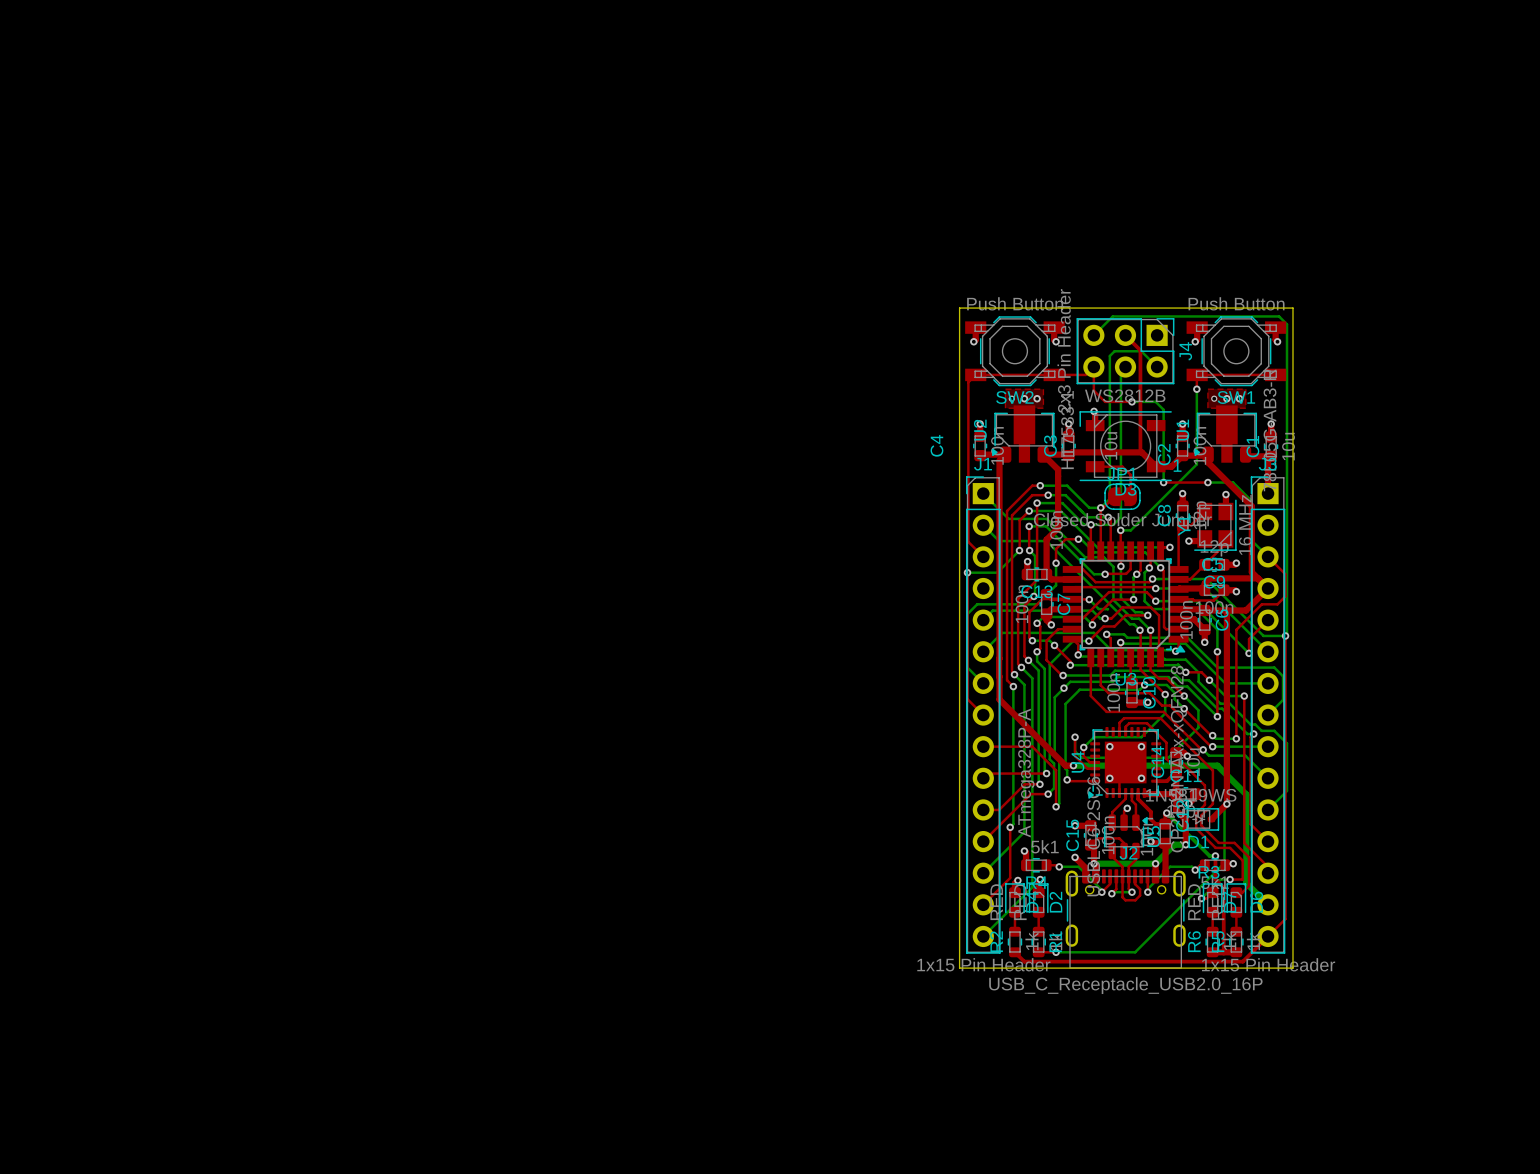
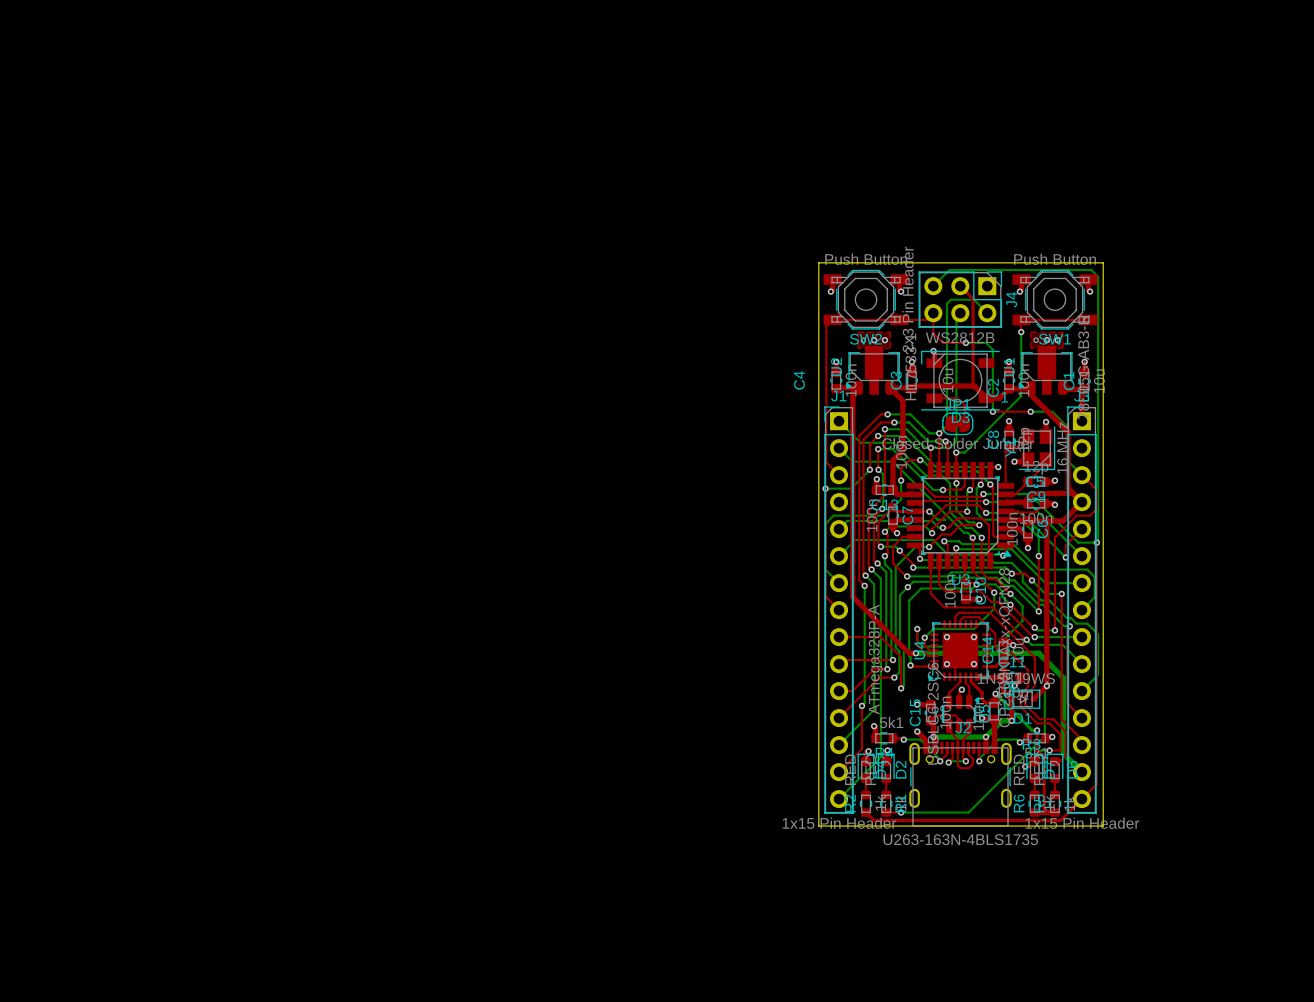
J2 value: USB_C_Receptacle_USB2.0_16P (1125, 985) -> U263-163N-4BLS1735 (960, 839)

